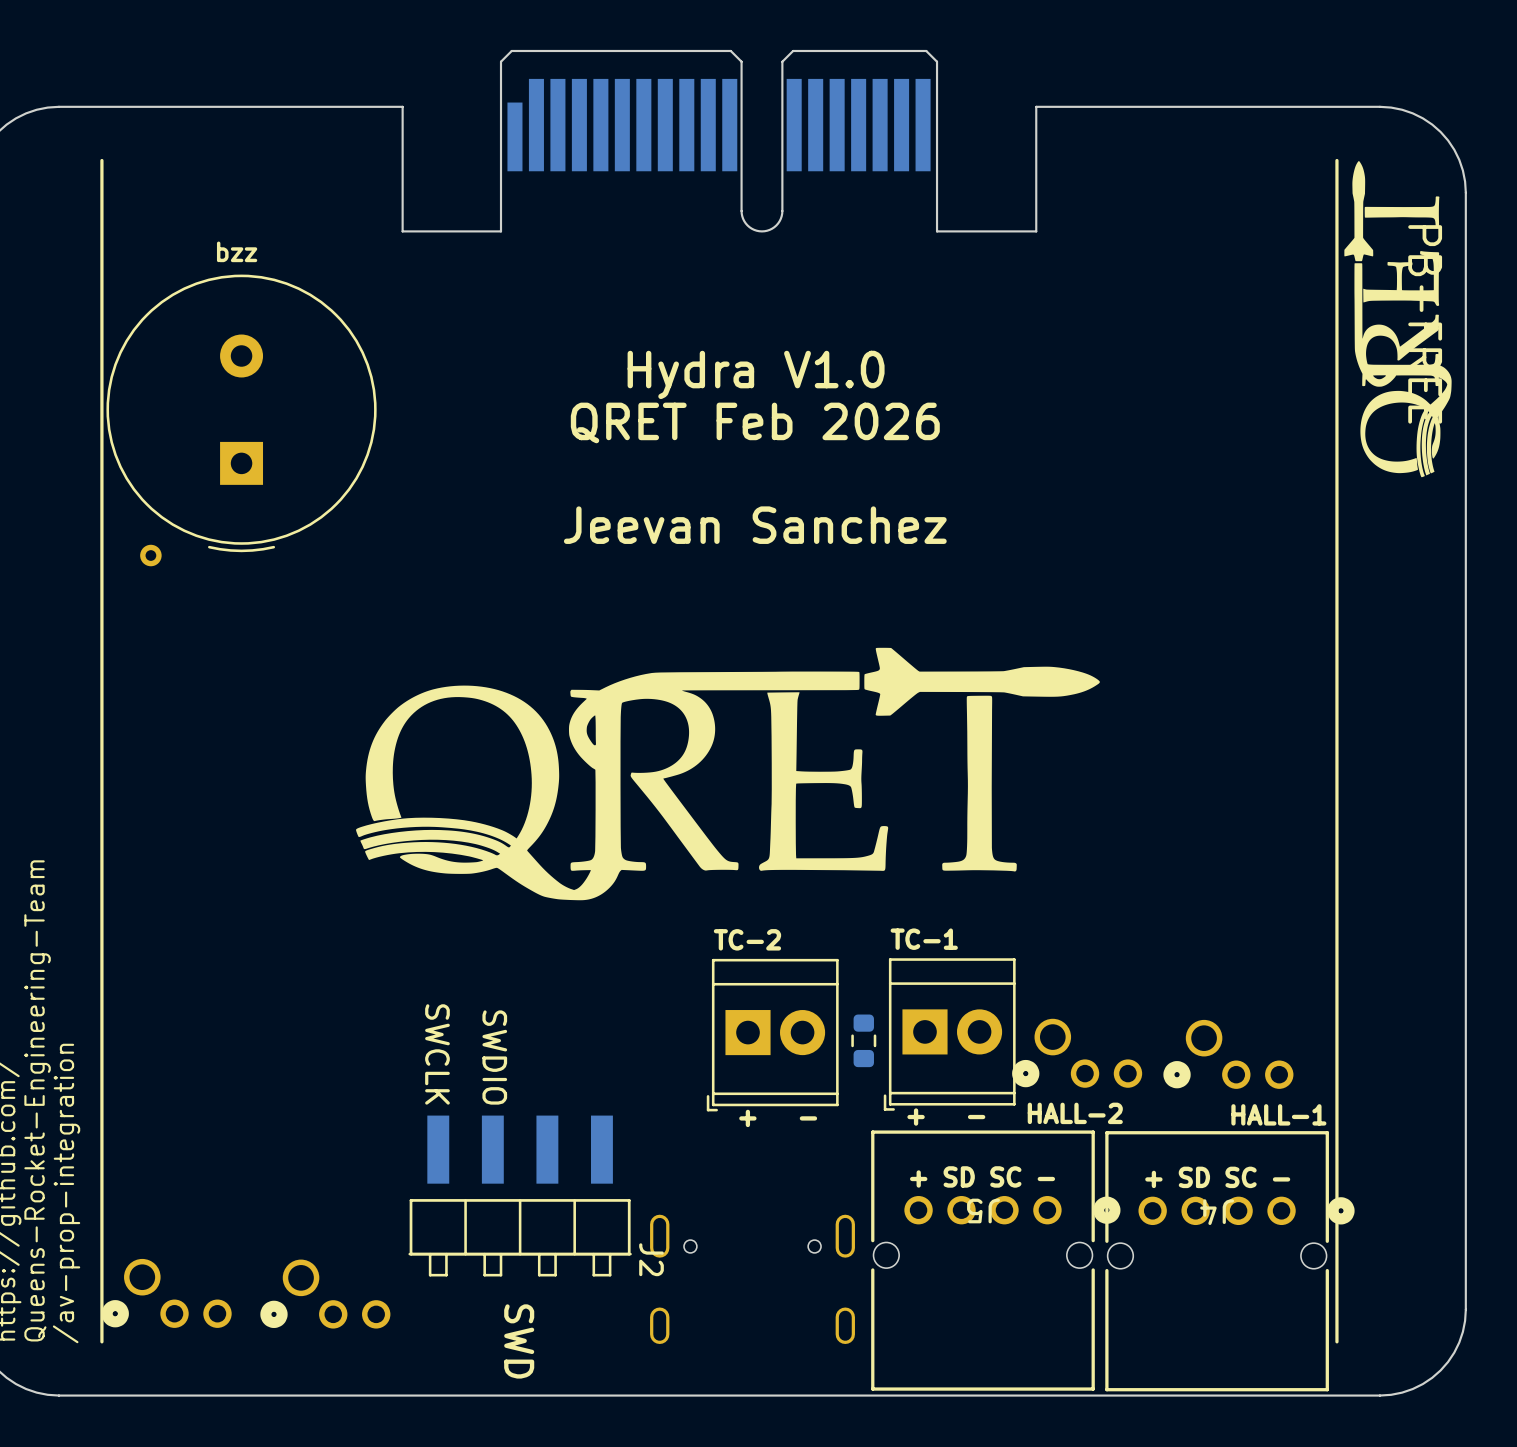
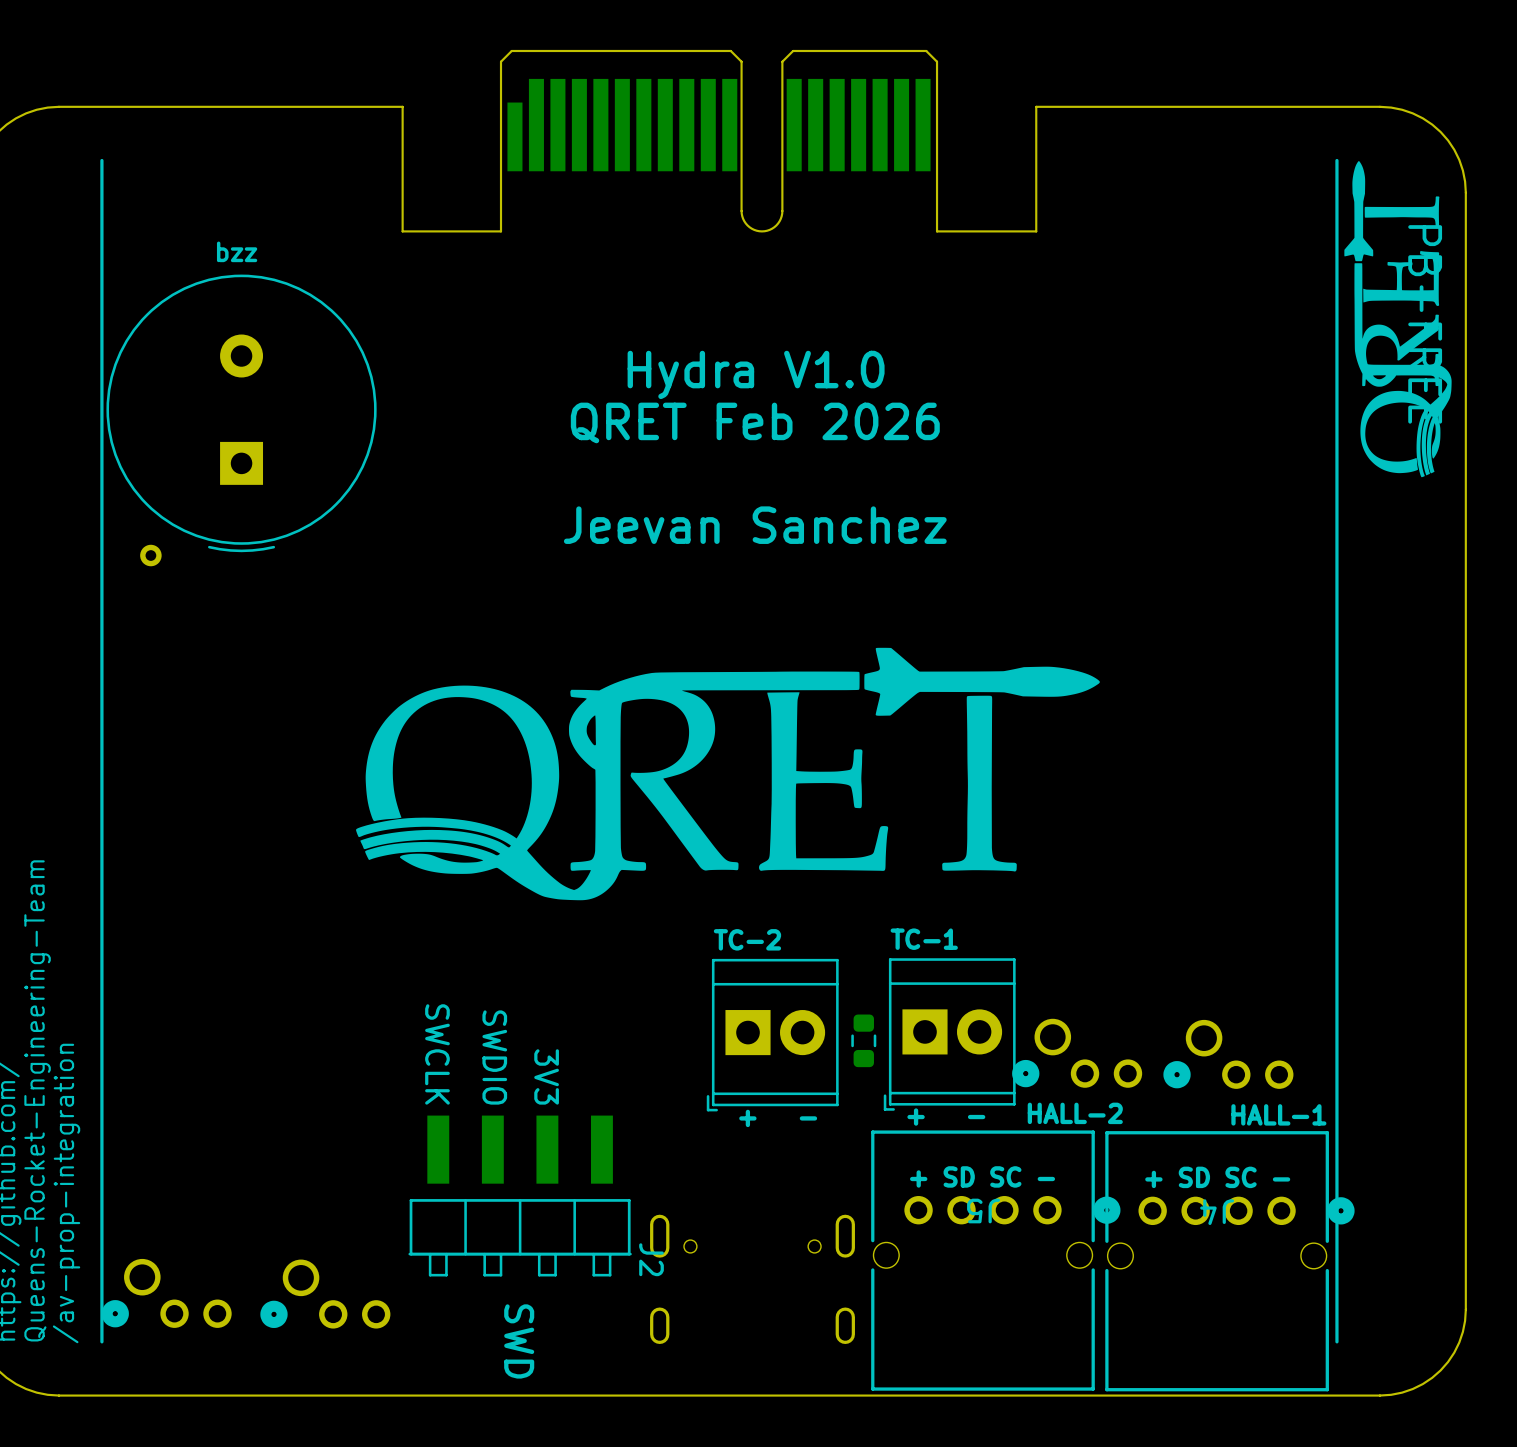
J2 text: none -> 3V3 (546, 1076)

